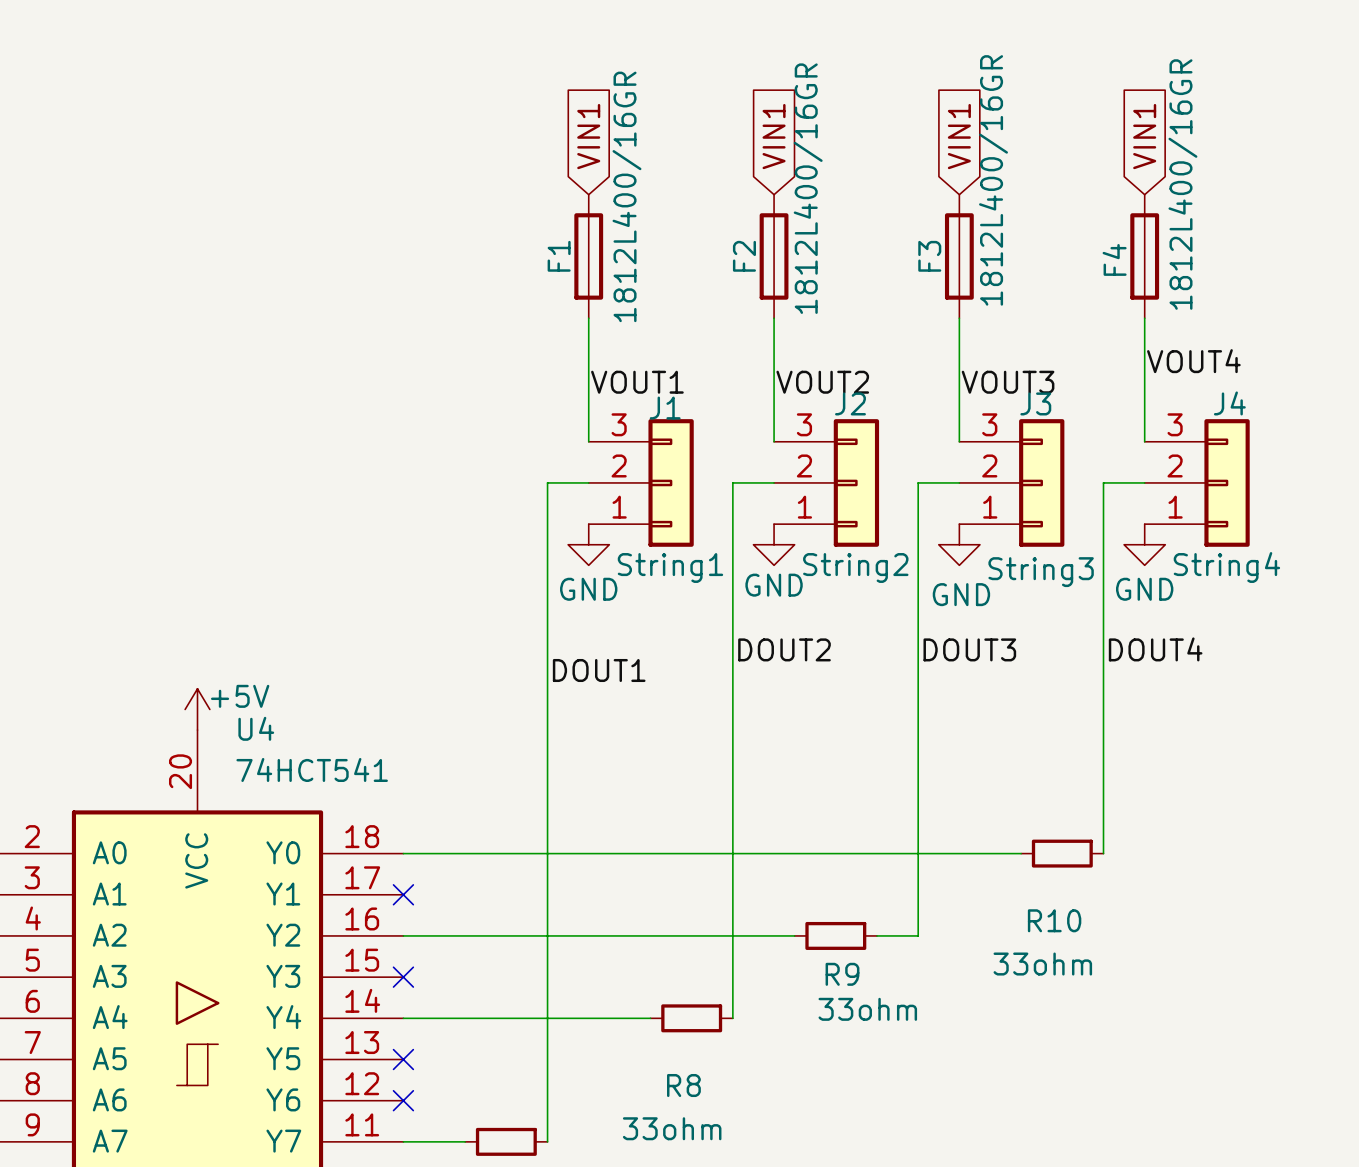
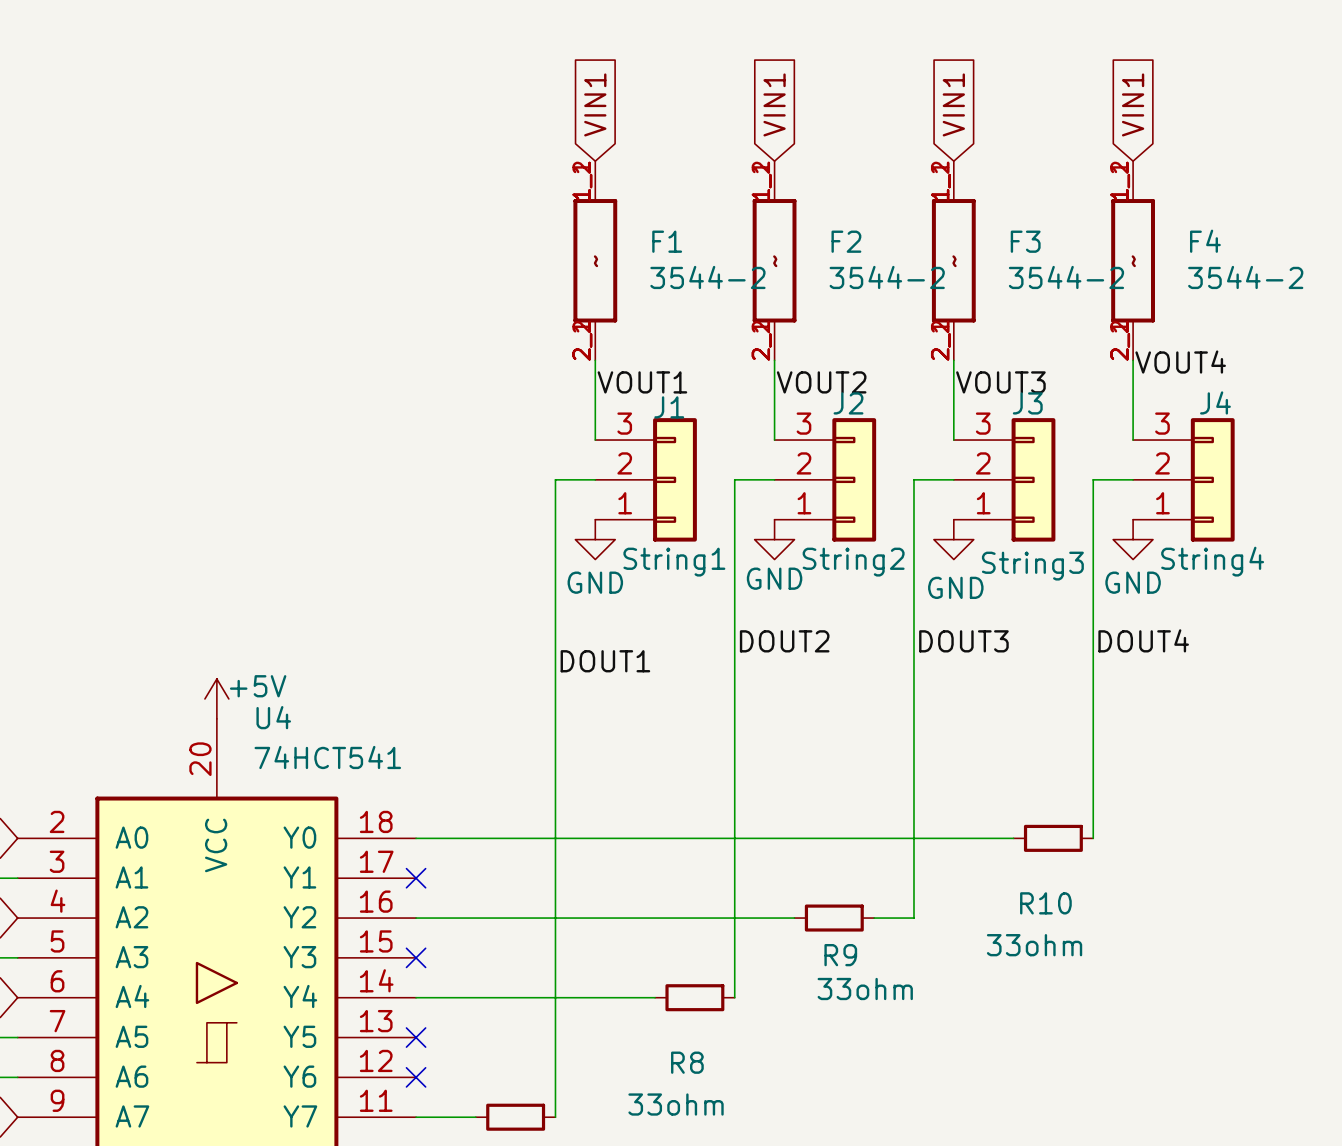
global label position: VIN1 (588, 136) -> VIN1 (595, 104)
global label position: VIN1 (774, 136) -> VIN1 (774, 104)
global label position: VIN1 (959, 136) -> VIN1 (953, 104)
global label position: VIN1 (1144, 136) -> VIN1 (1133, 104)
F3 value: 1812L400/16GR (993, 180) -> 3544-2 (1066, 277)
F4 value: 1812L400/16GR (1182, 184) -> 3544-2 (1245, 277)
F2 value: 1812L400/16GR (808, 188) -> 3544-2 (887, 277)
F1 symbol: [574, 194, 604, 319] -> [573, 161, 618, 361]
F2 symbol: [759, 194, 789, 319] -> [752, 161, 797, 361]
F3 symbol: [944, 194, 974, 319] -> [931, 161, 976, 361]
F4 symbol: [1130, 194, 1160, 319] -> [1111, 161, 1155, 361]
F1 value: 1812L400/16GR (626, 196) -> 3544-2 (707, 277)
F1 name position: F1 (559, 256) -> F1 (667, 241)
F2 name position: F2 (744, 256) -> F2 (846, 241)
F3 name position: F3 (929, 256) -> F3 (1025, 241)
F4 name position: F4 (1114, 259) -> F4 (1205, 241)

